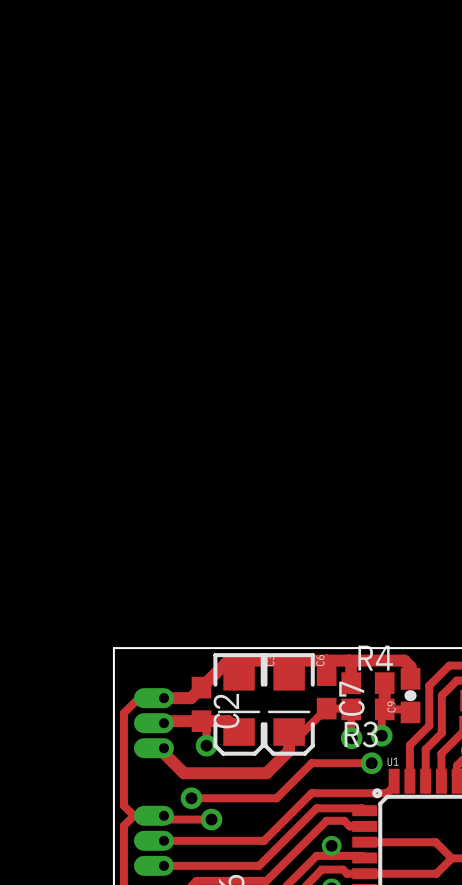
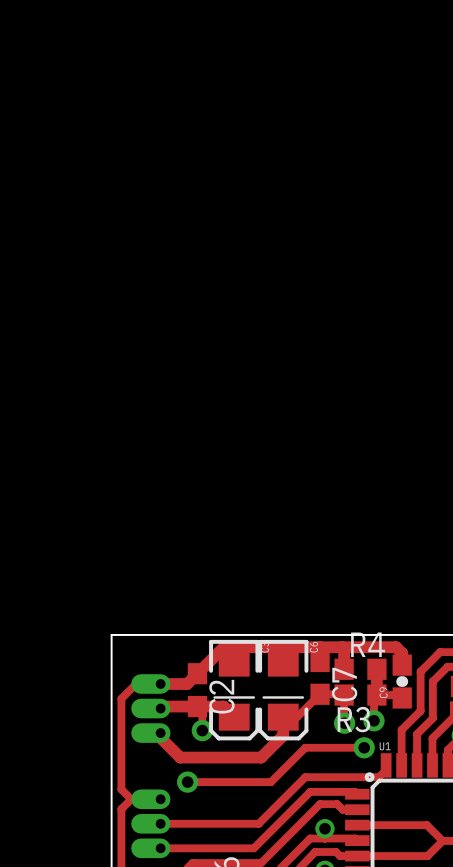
track: (163, 815) (167, 819) (211, 819) -> none
via: (211, 819) -> none

